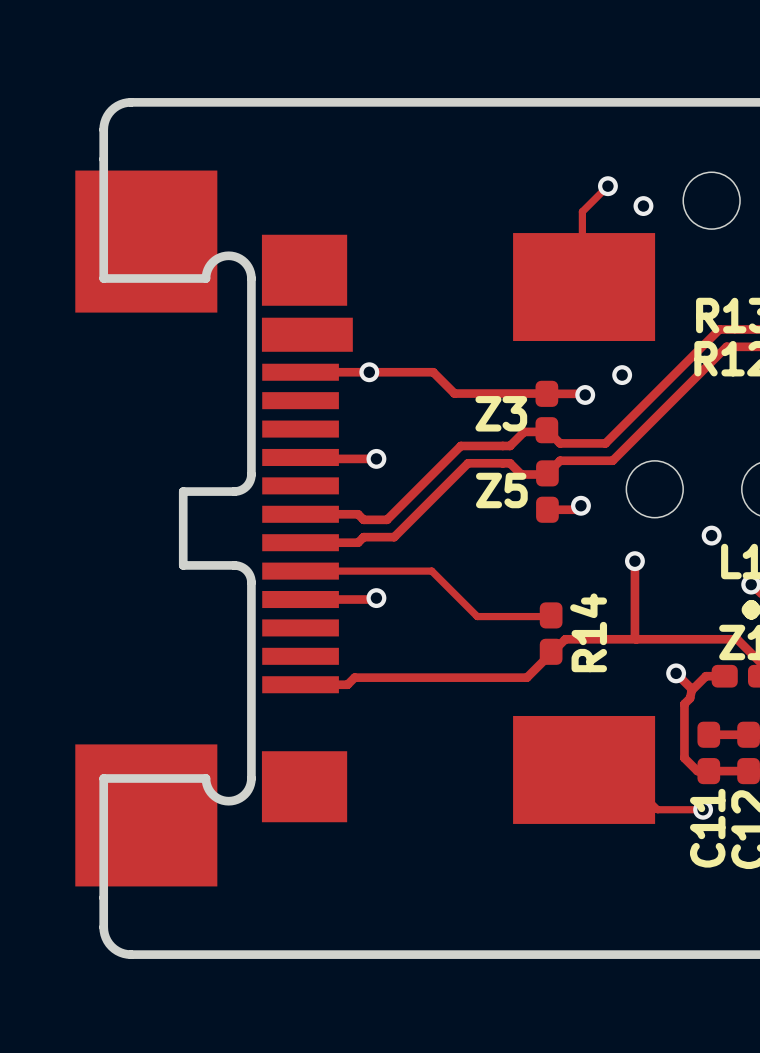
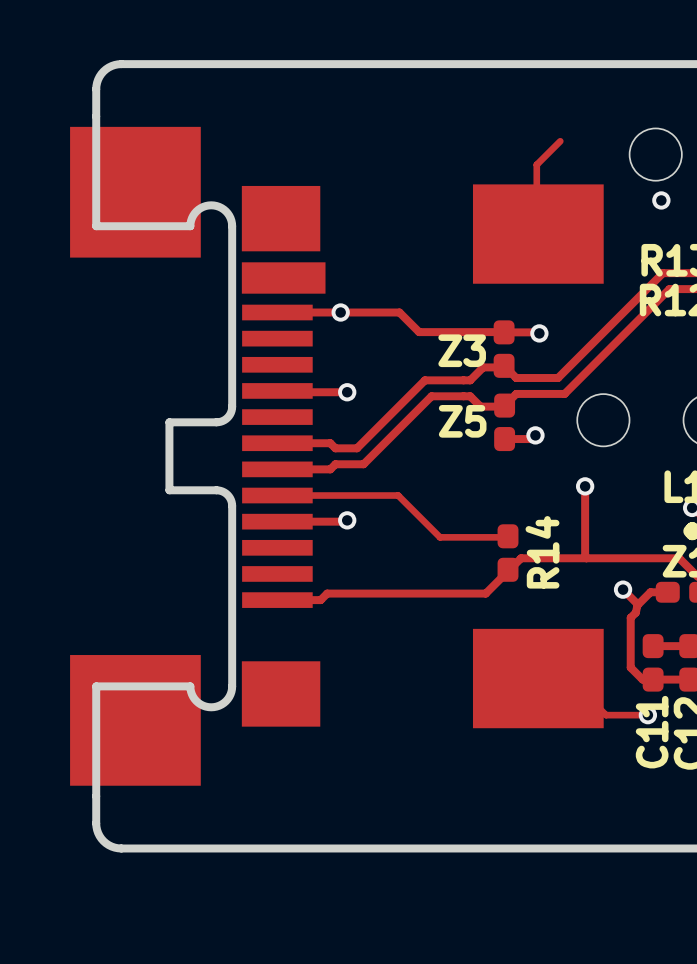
via: (607, 186) -> none
via: (643, 206) -> none
via: none -> (661, 200)
via: (622, 375) -> none
via: (711, 535) -> none

